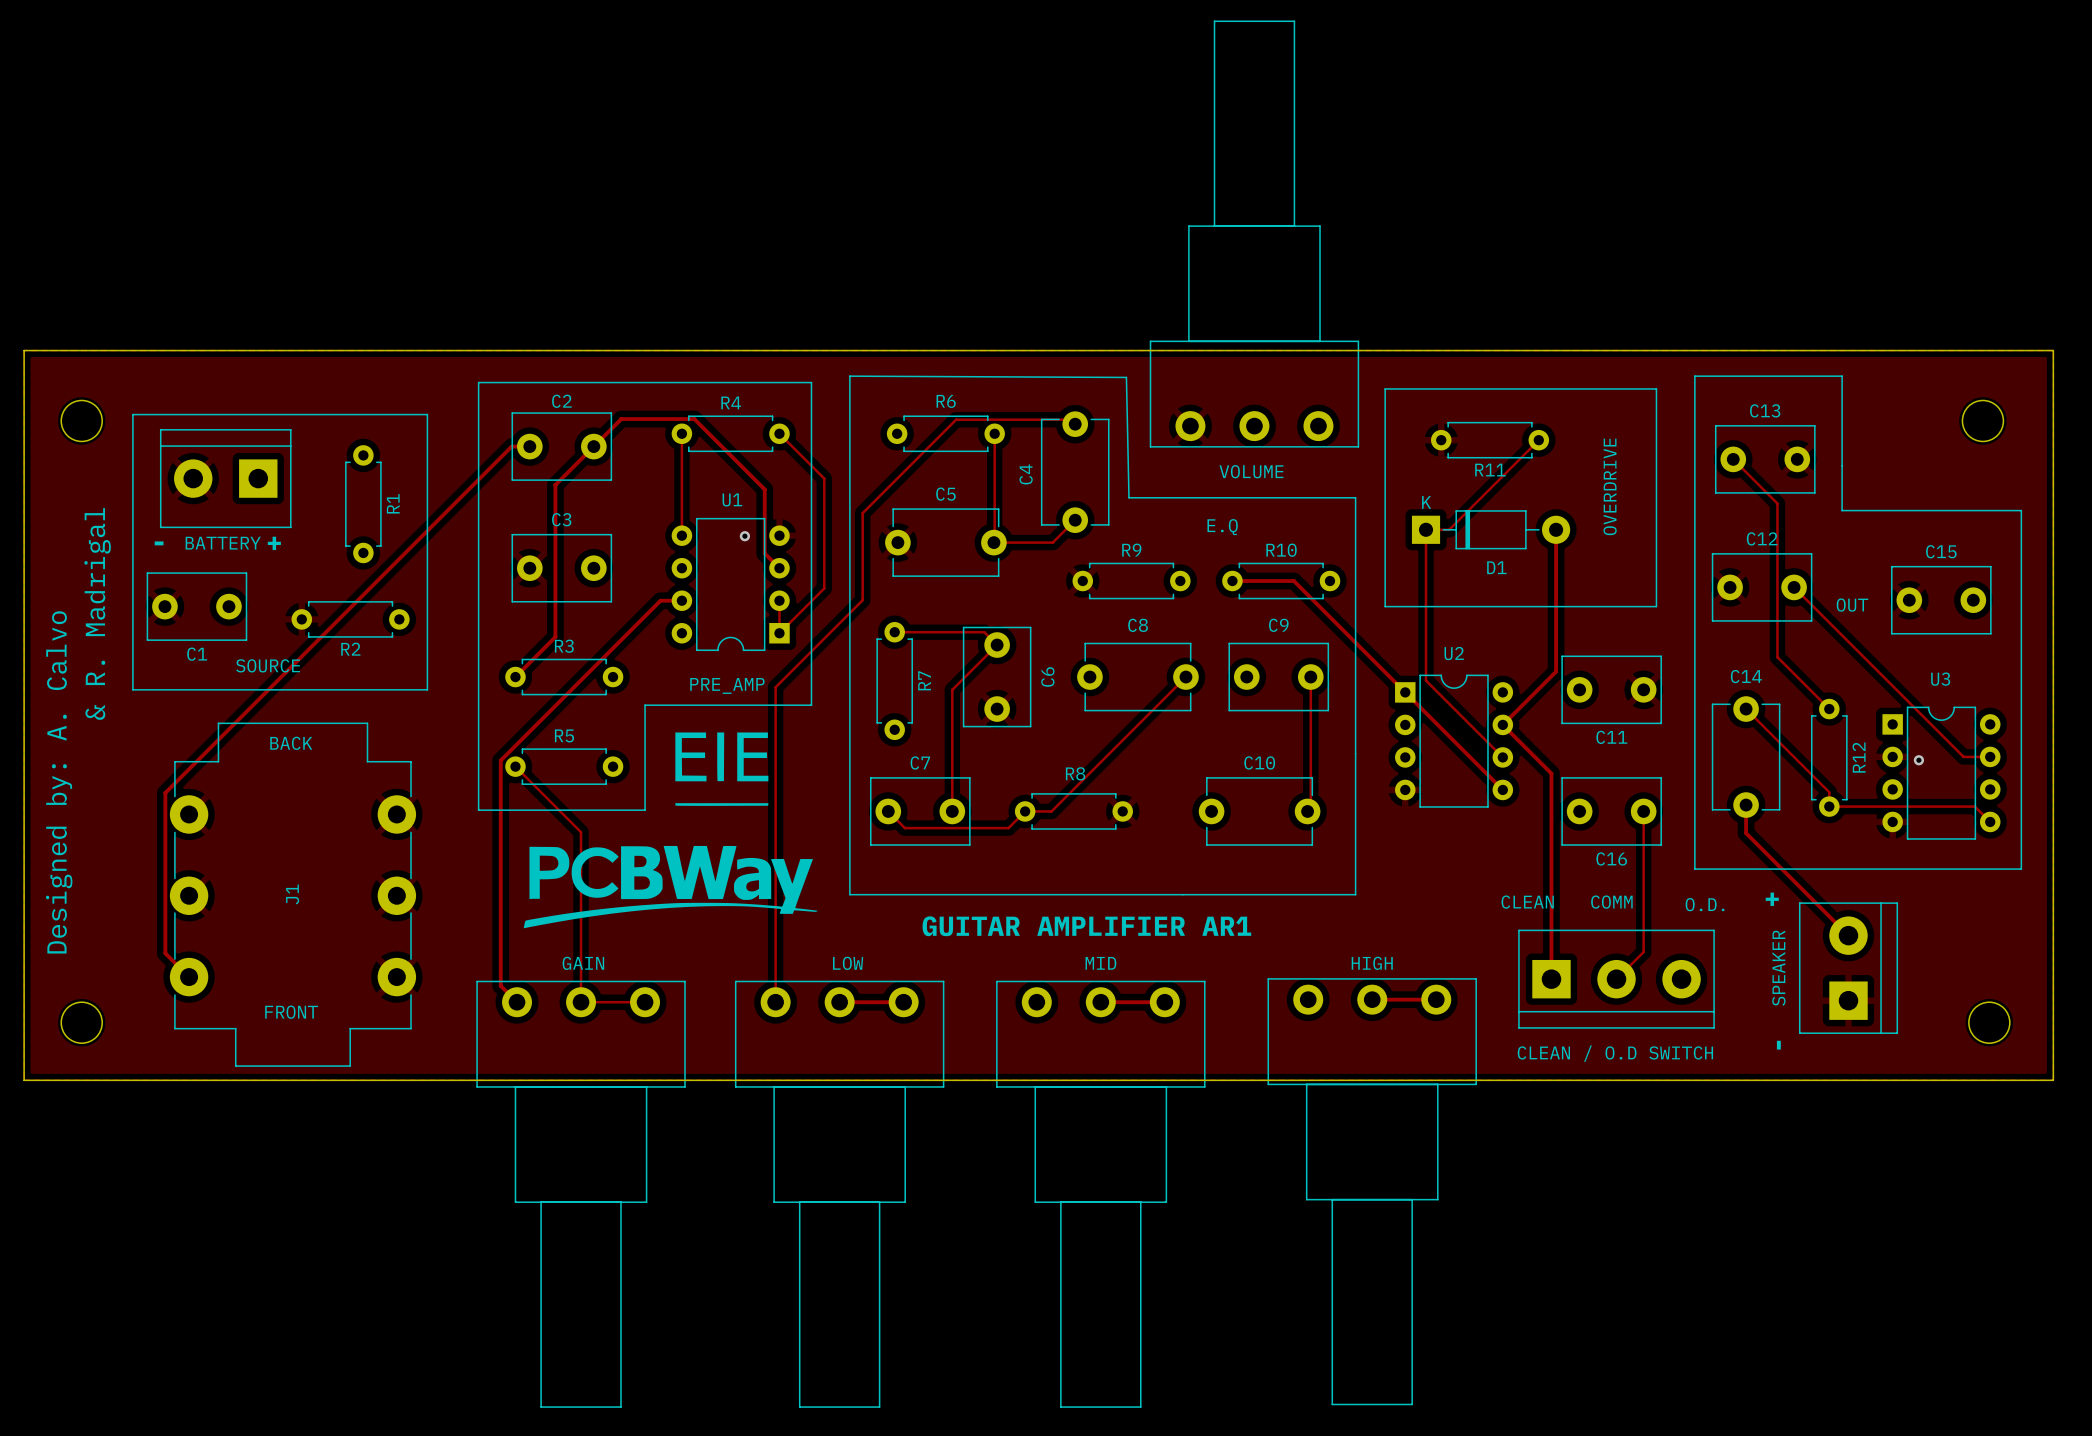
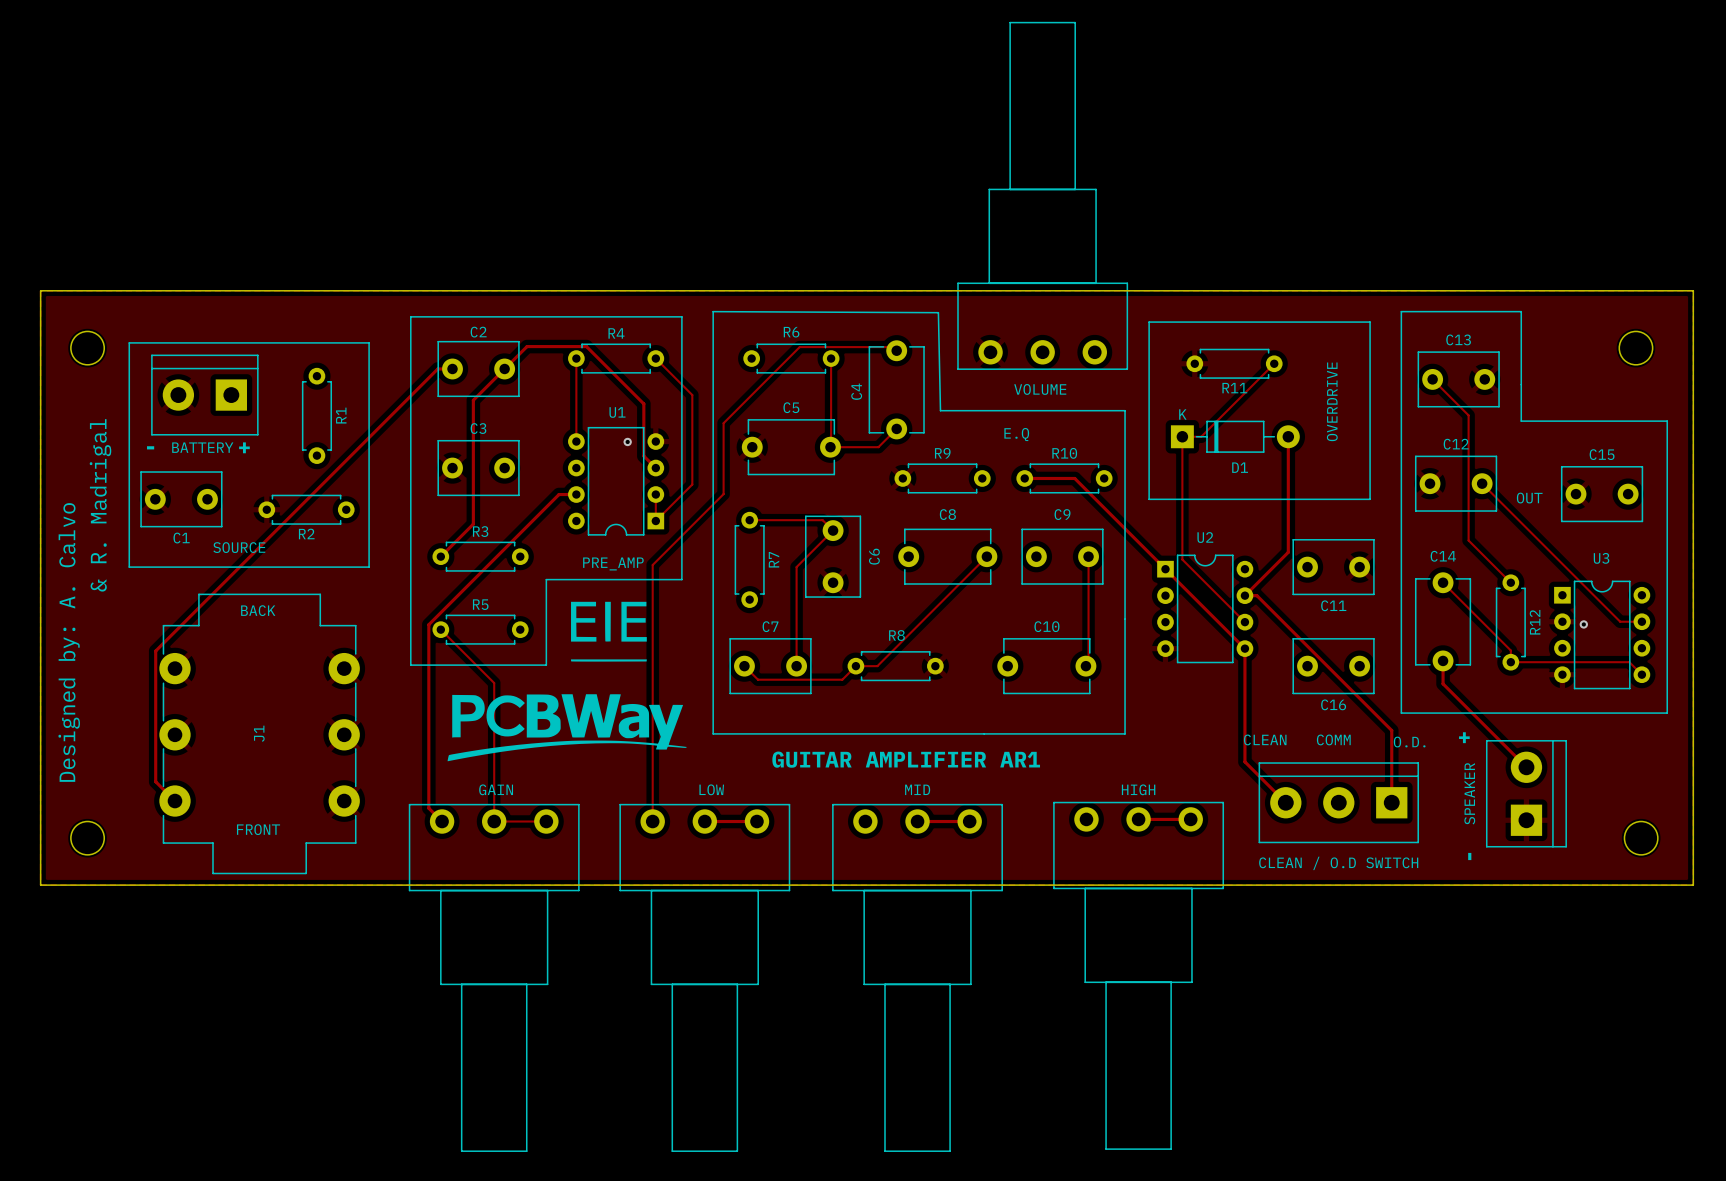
track: (1502, 724) (1551, 773) (1551, 979) -> (1244, 595) (1256, 595) (1391, 730) (1391, 802)
track: none -> (1244, 648) (1244, 761) (1285, 802)
track: (1643, 811) (1643, 952) (1616, 979) -> none
CLEAN / O.D SWITCH rotation: 0° (1616, 979) -> 180° (1338, 802)

